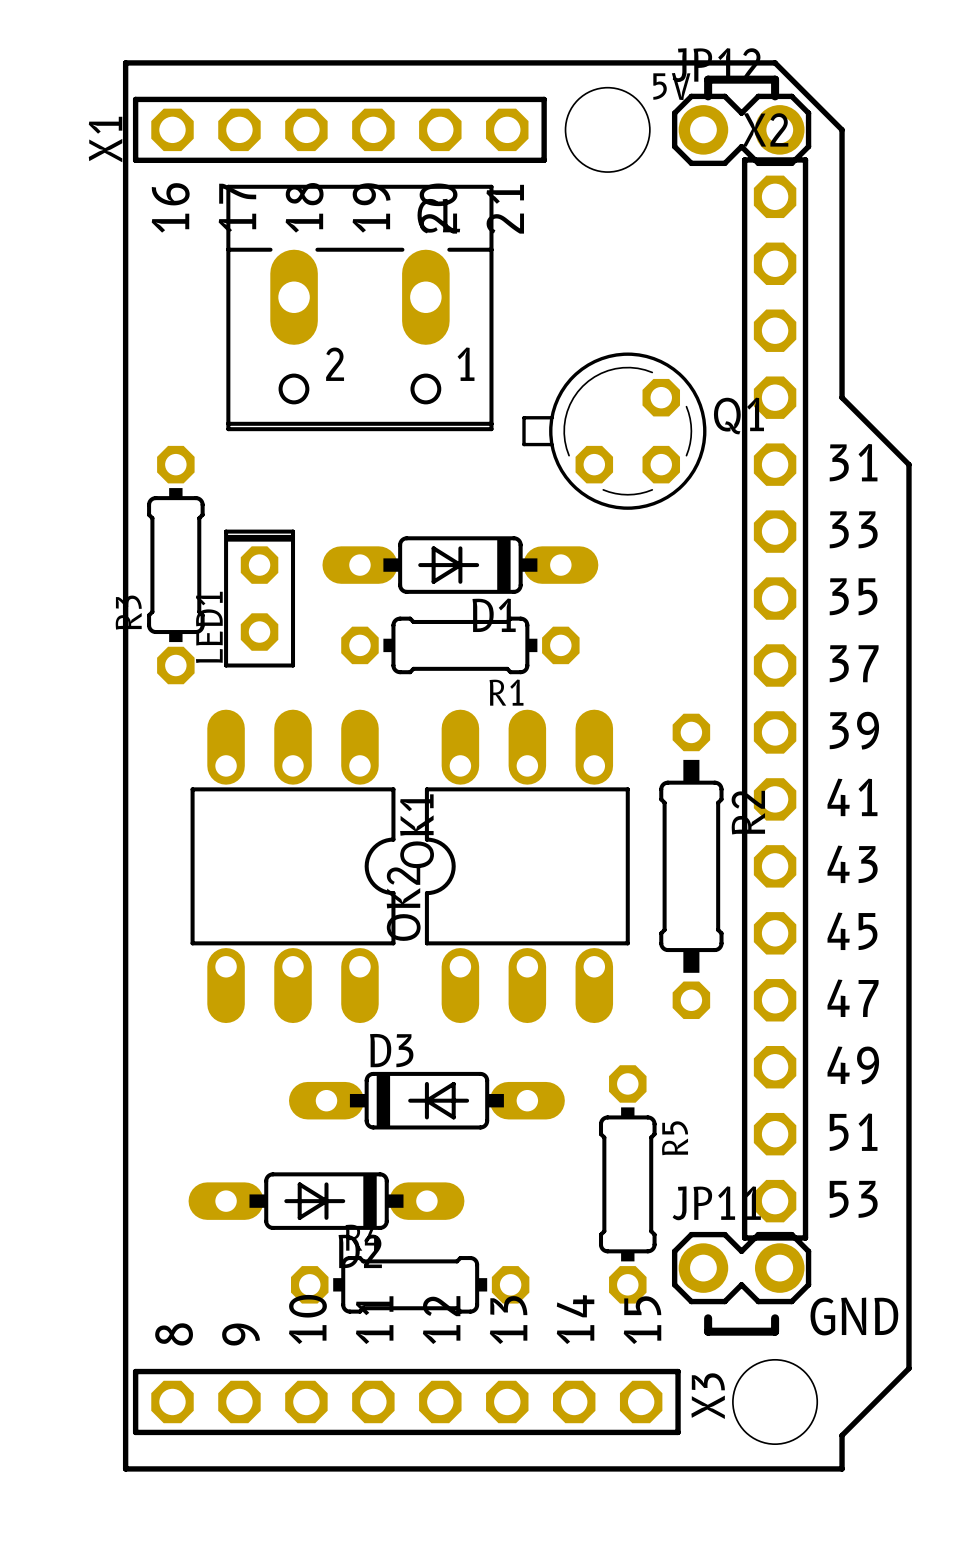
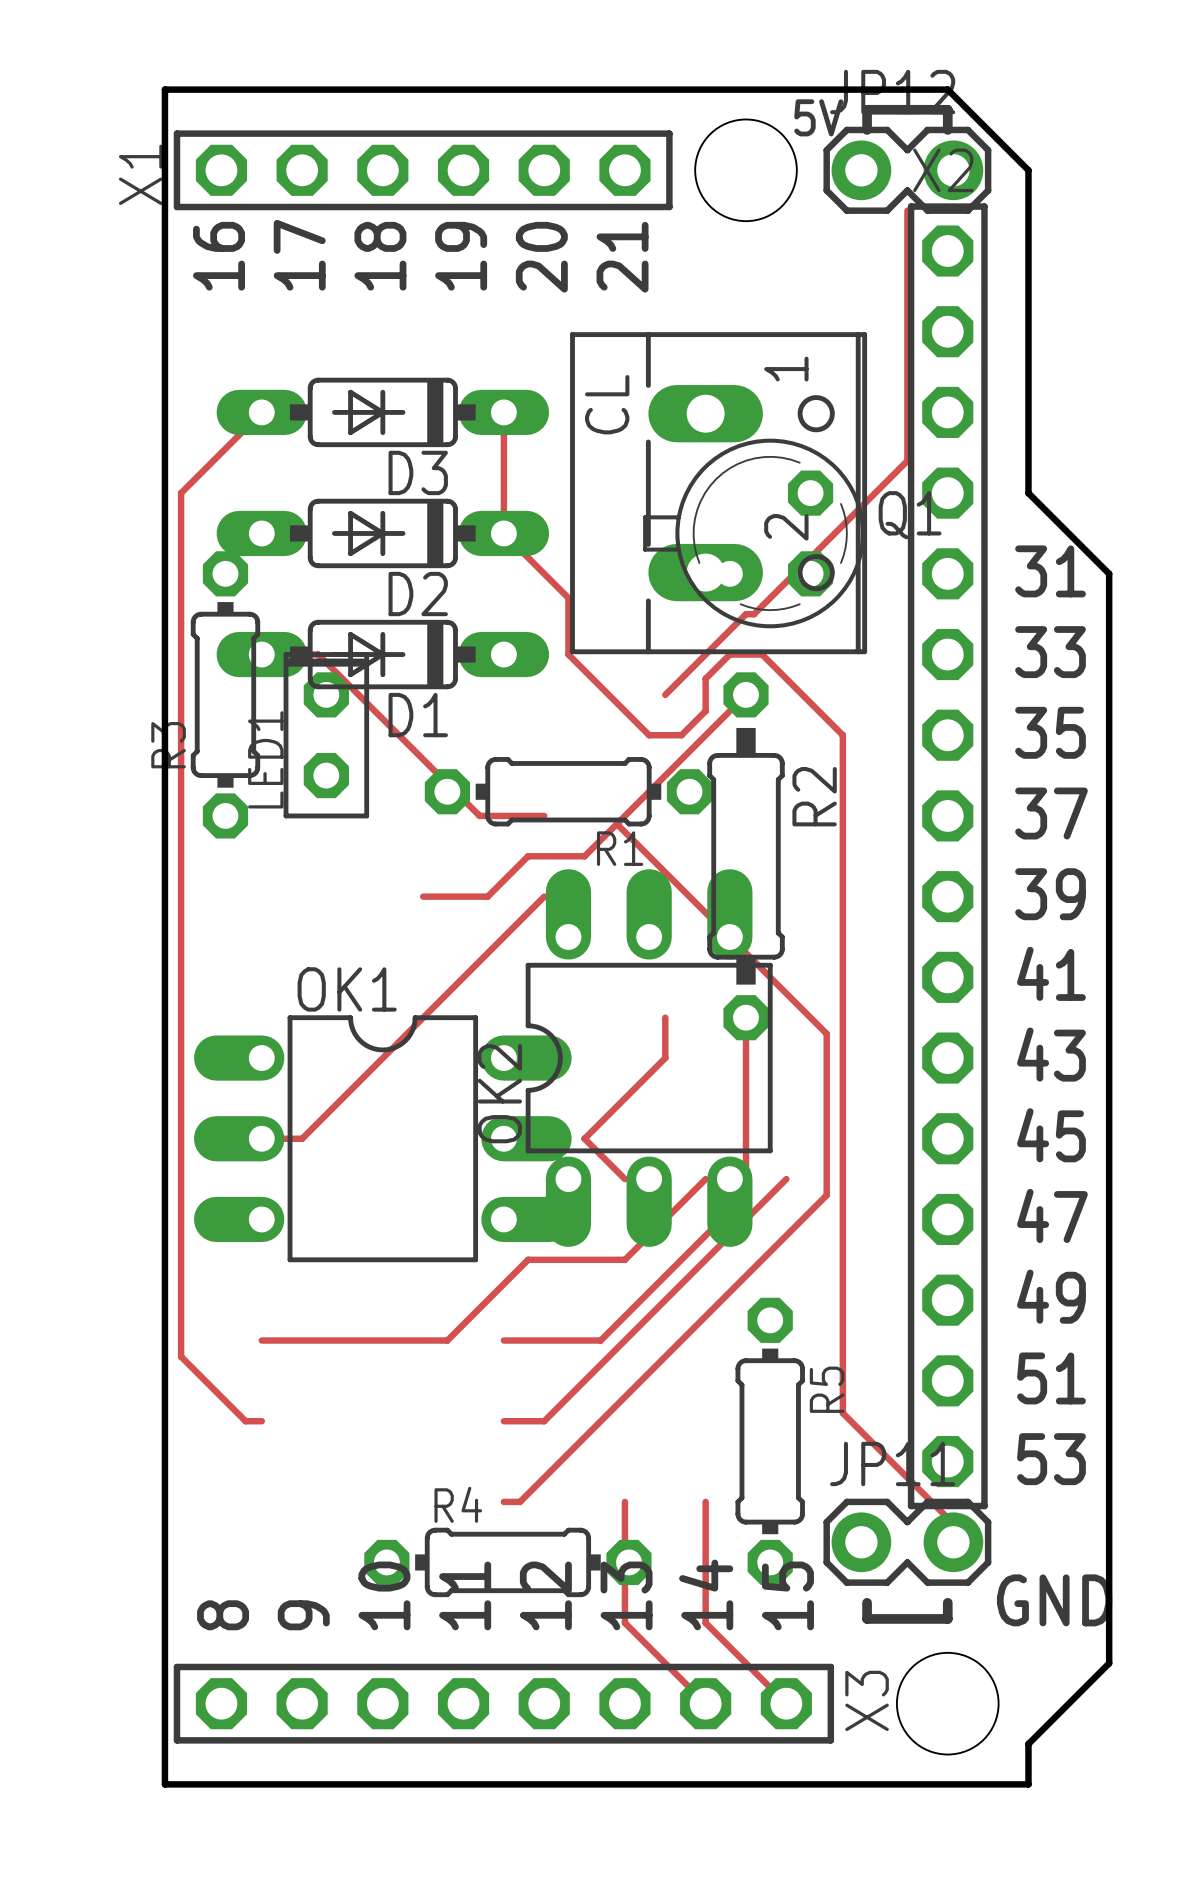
track: none -> (907, 210) (907, 460) (754, 614) (746, 614) (665, 694)
CL rotation: 0° (359, 307) -> 90° counterclockwise (718, 493)
CL position: (359, 307) -> (718, 493)
track: none -> (261, 412) (181, 493) (181, 1356) (245, 1421) (261, 1421)
track: none -> (503, 412) (503, 533) (568, 598) (568, 654) (649, 735) (681, 735) (705, 711) (705, 678) (729, 654) (762, 654) (842, 735) (842, 1413) (947, 1518) (947, 1542)
track: none -> (261, 654) (318, 654) (479, 815) (544, 815)
D1 position: (460, 565) -> (382, 654)
track: none -> (746, 694) (584, 856) (528, 856) (487, 896) (423, 896)
track: none -> (616, 824) (826, 1033) (826, 1195) (520, 1501) (503, 1501)
track: none -> (544, 896) (302, 1138) (261, 1138)
track: none -> (665, 1017) (665, 1058) (584, 1138) (624, 1179)
track: none -> (746, 1017) (746, 1195) (600, 1340) (503, 1340)
OK1 rotation: 0° (293, 866) -> 90° counterclockwise (382, 1138)
R2 position: (691, 866) -> (746, 856)
track: none -> (705, 1179) (624, 1259) (528, 1259) (447, 1340) (261, 1340)
track: none -> (786, 1179) (544, 1421) (503, 1421)
D3 rotation: 0° (426, 1100) -> 180° (382, 412)
D3 position: (426, 1100) -> (382, 412)
D2 position: (326, 1201) -> (382, 533)
track: none -> (624, 1501) (624, 1622) (705, 1703)
track: none -> (705, 1501) (705, 1622) (786, 1703)

